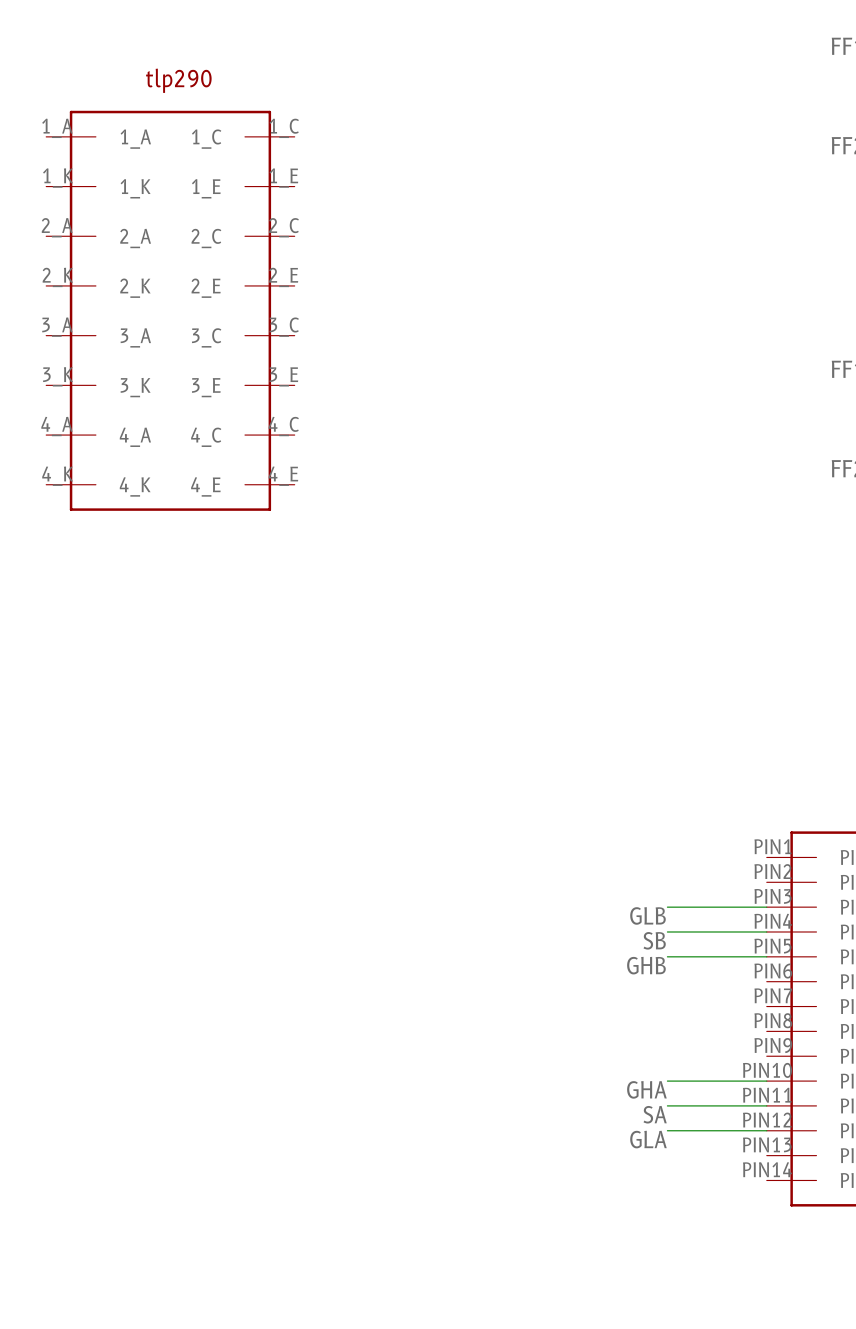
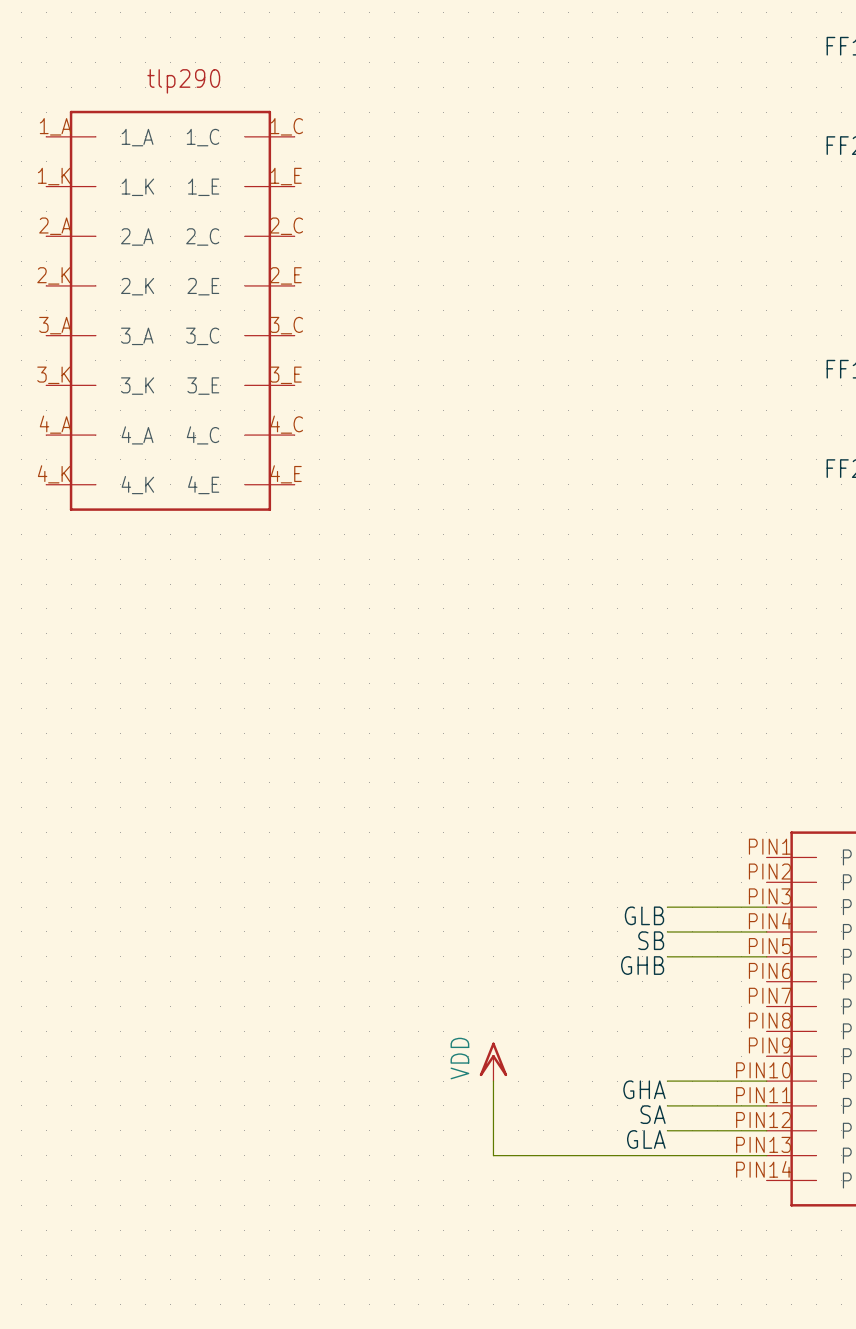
power symbol: none -> VDD (493, 1061)
wire: none -> (493, 1081) (493, 1155) (766, 1155)

